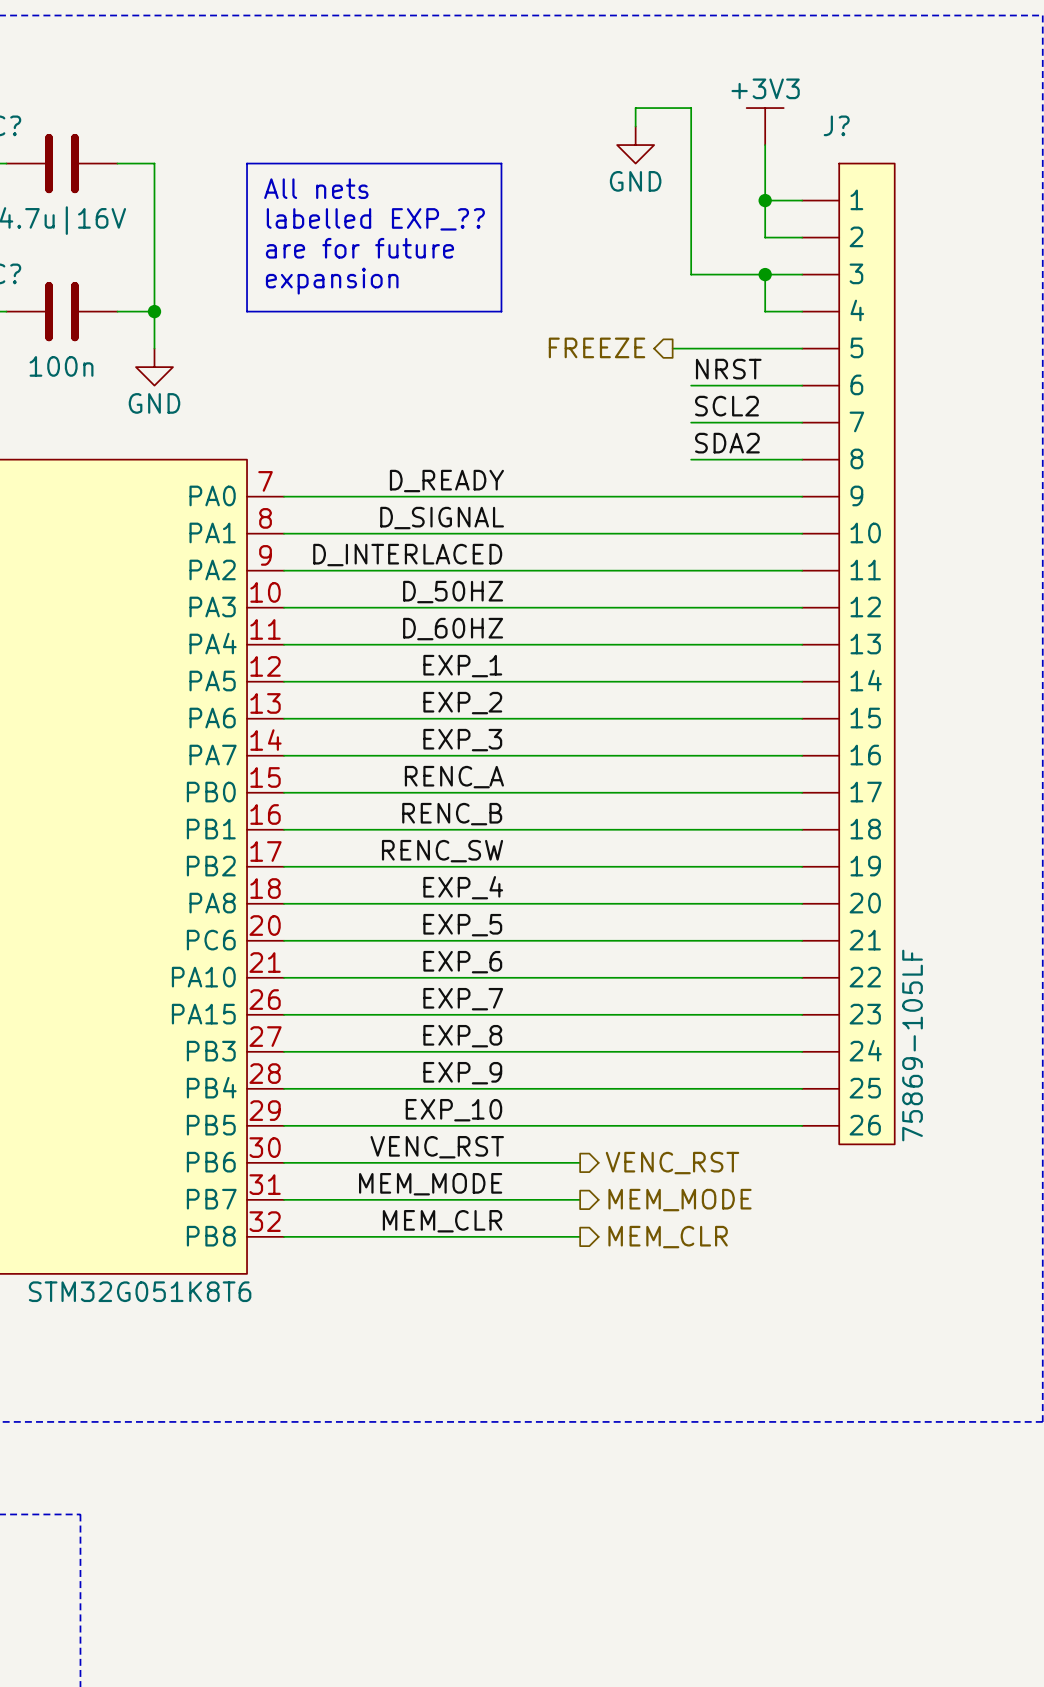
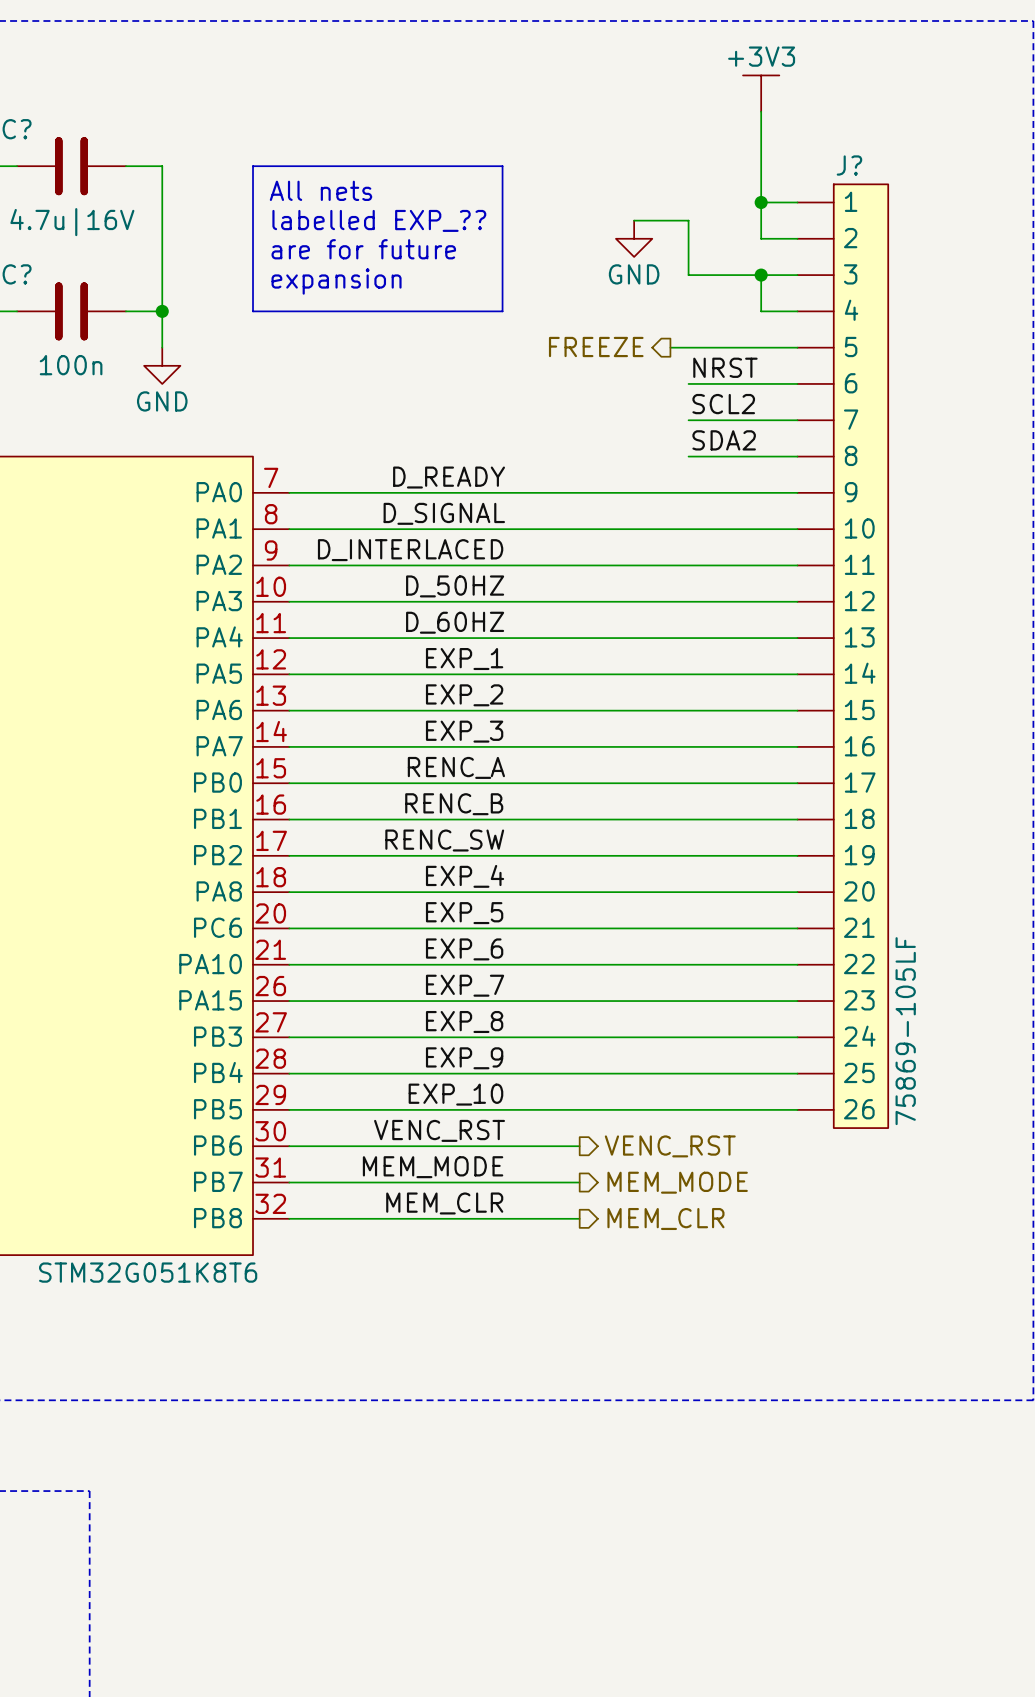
J? name position: J? (836, 125) -> J? (849, 165)
wire: (635, 126) (635, 108) (691, 108) (691, 219) -> (634, 220) (688, 220)
power symbol position: +3V3 (765, 126) -> +3V3 (761, 93)
power symbol position: GND (635, 145) -> GND (634, 238)
J? symbol: [802, 163, 895, 1145] -> [797, 184, 889, 1129]

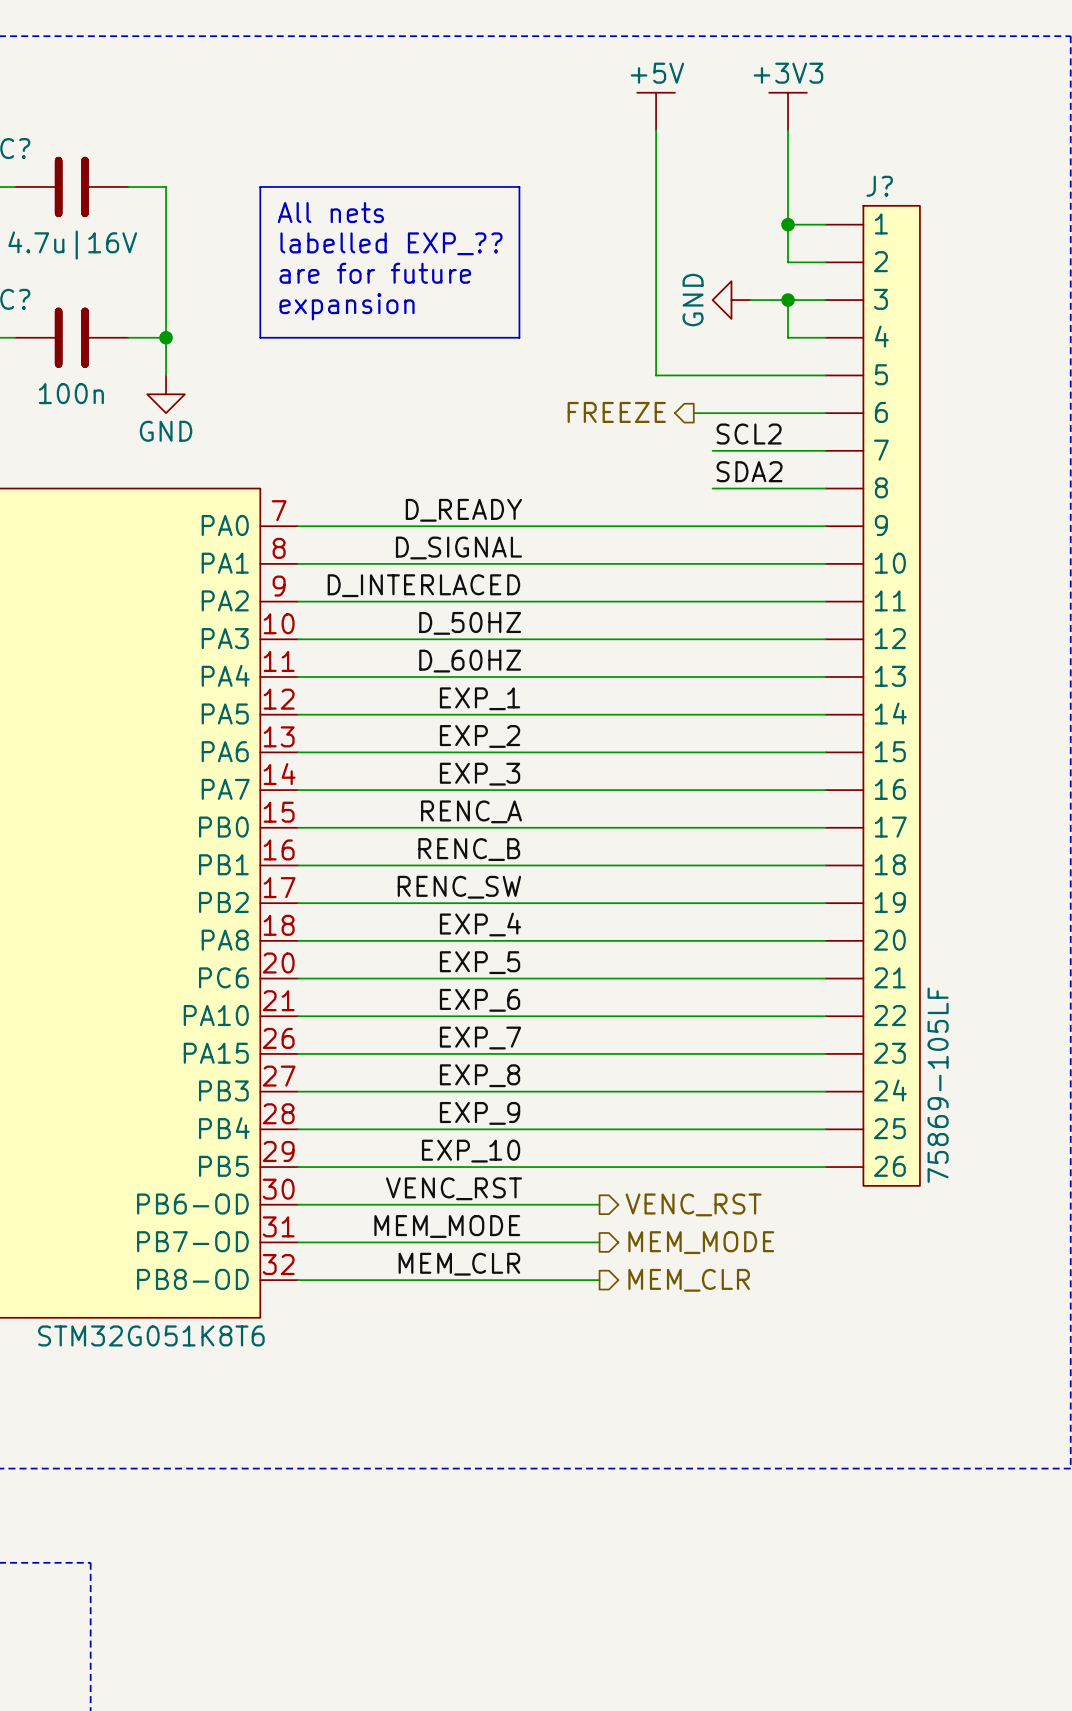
power symbol: none -> +5V (656, 111)
wire: none -> (656, 130) (656, 375) (693, 375)
wire: (634, 220) (688, 220) (688, 275) (724, 275) -> none
power symbol rotation: 0° (634, 238) -> 90° clockwise (731, 300)
power symbol position: GND (634, 238) -> GND (731, 300)
hierarchical label position: FREEZE (596, 346) -> FREEZE (616, 412)
label: NRST (725, 367) -> none
wire: none -> (693, 413) (712, 413)
part pin name: PB6 (217, 1145) -> PB6-OD (192, 1204)
part pin name: PB7 (218, 1181) -> PB7-OD (192, 1241)
part pin name: PB8 (217, 1218) -> PB8-OD (192, 1279)

